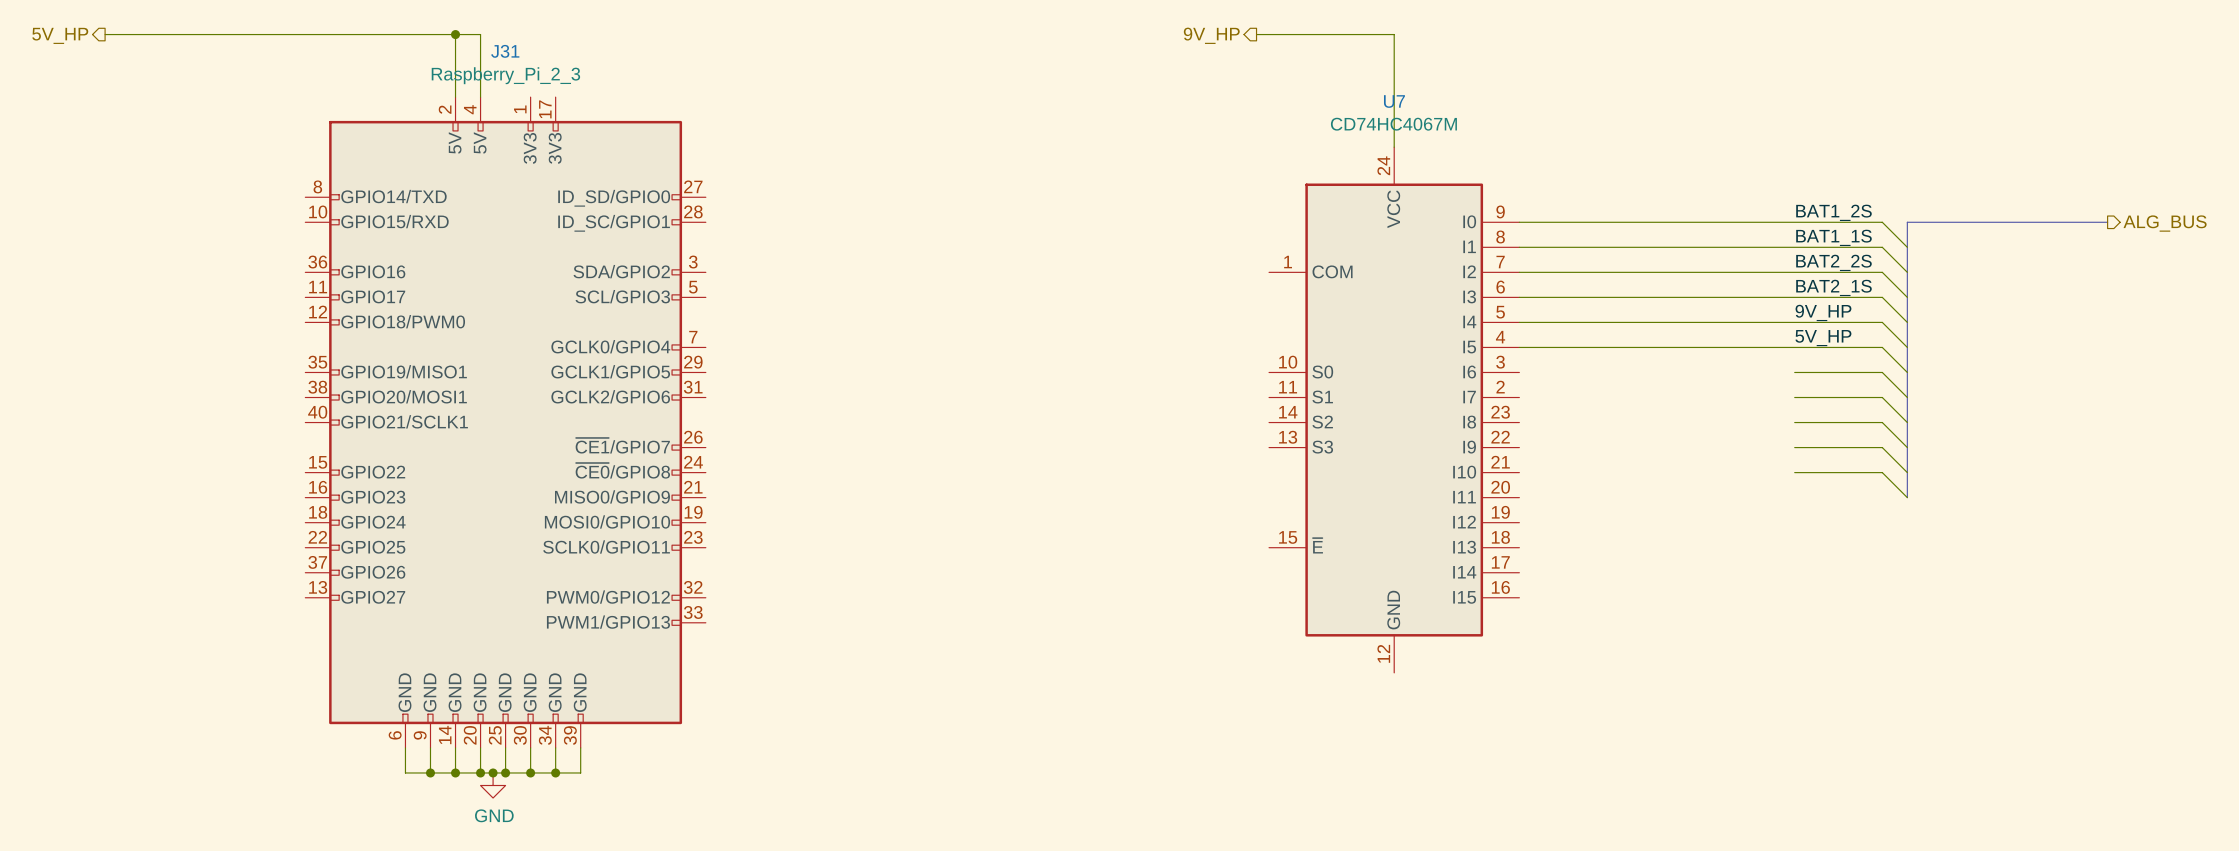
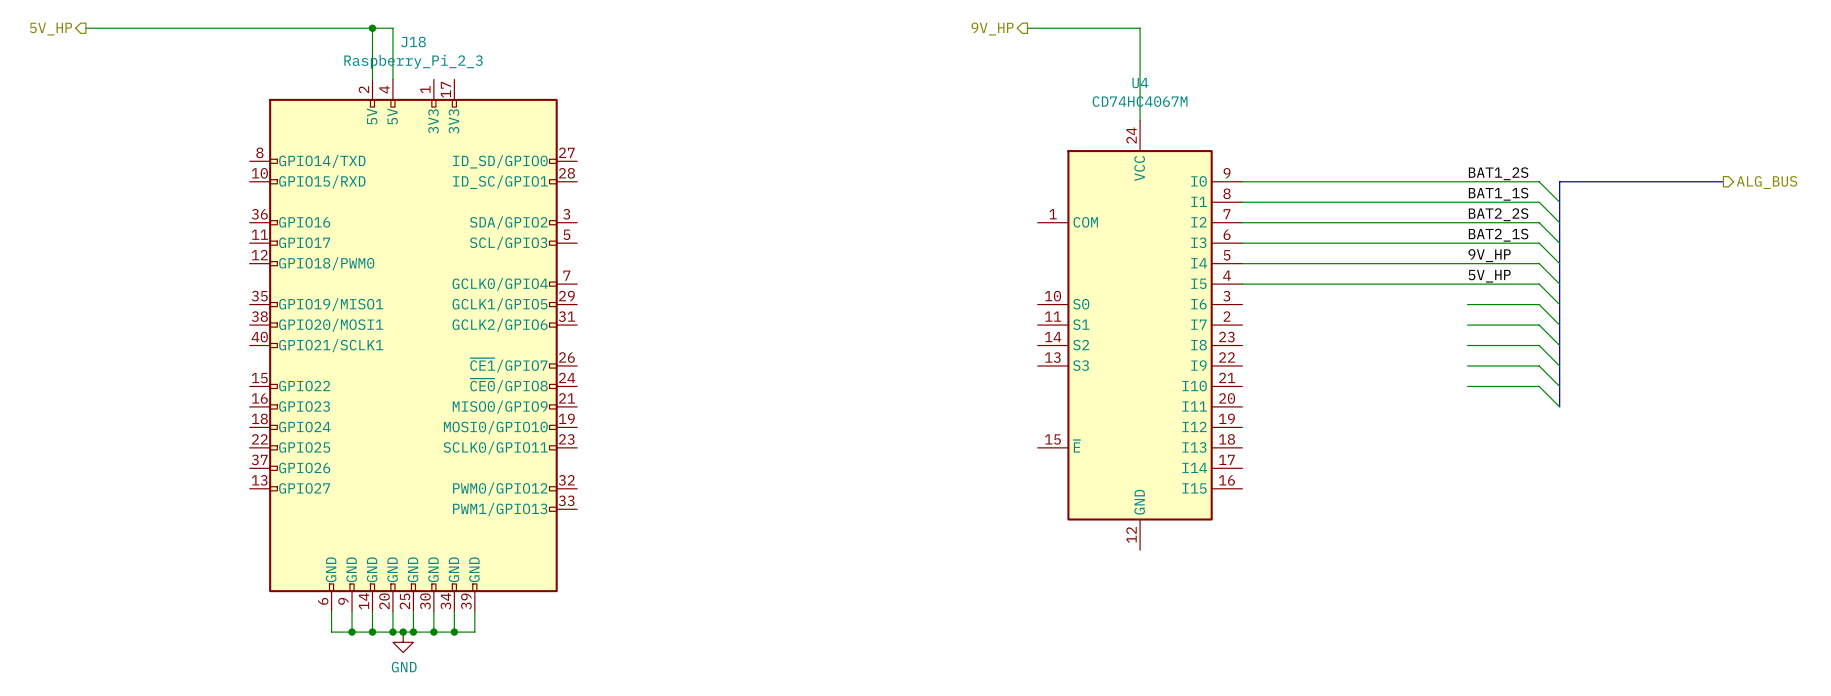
J31 name: J31 (505, 51) -> J18 (413, 41)
U7 name: U7 (1394, 101) -> U4 (1140, 83)

